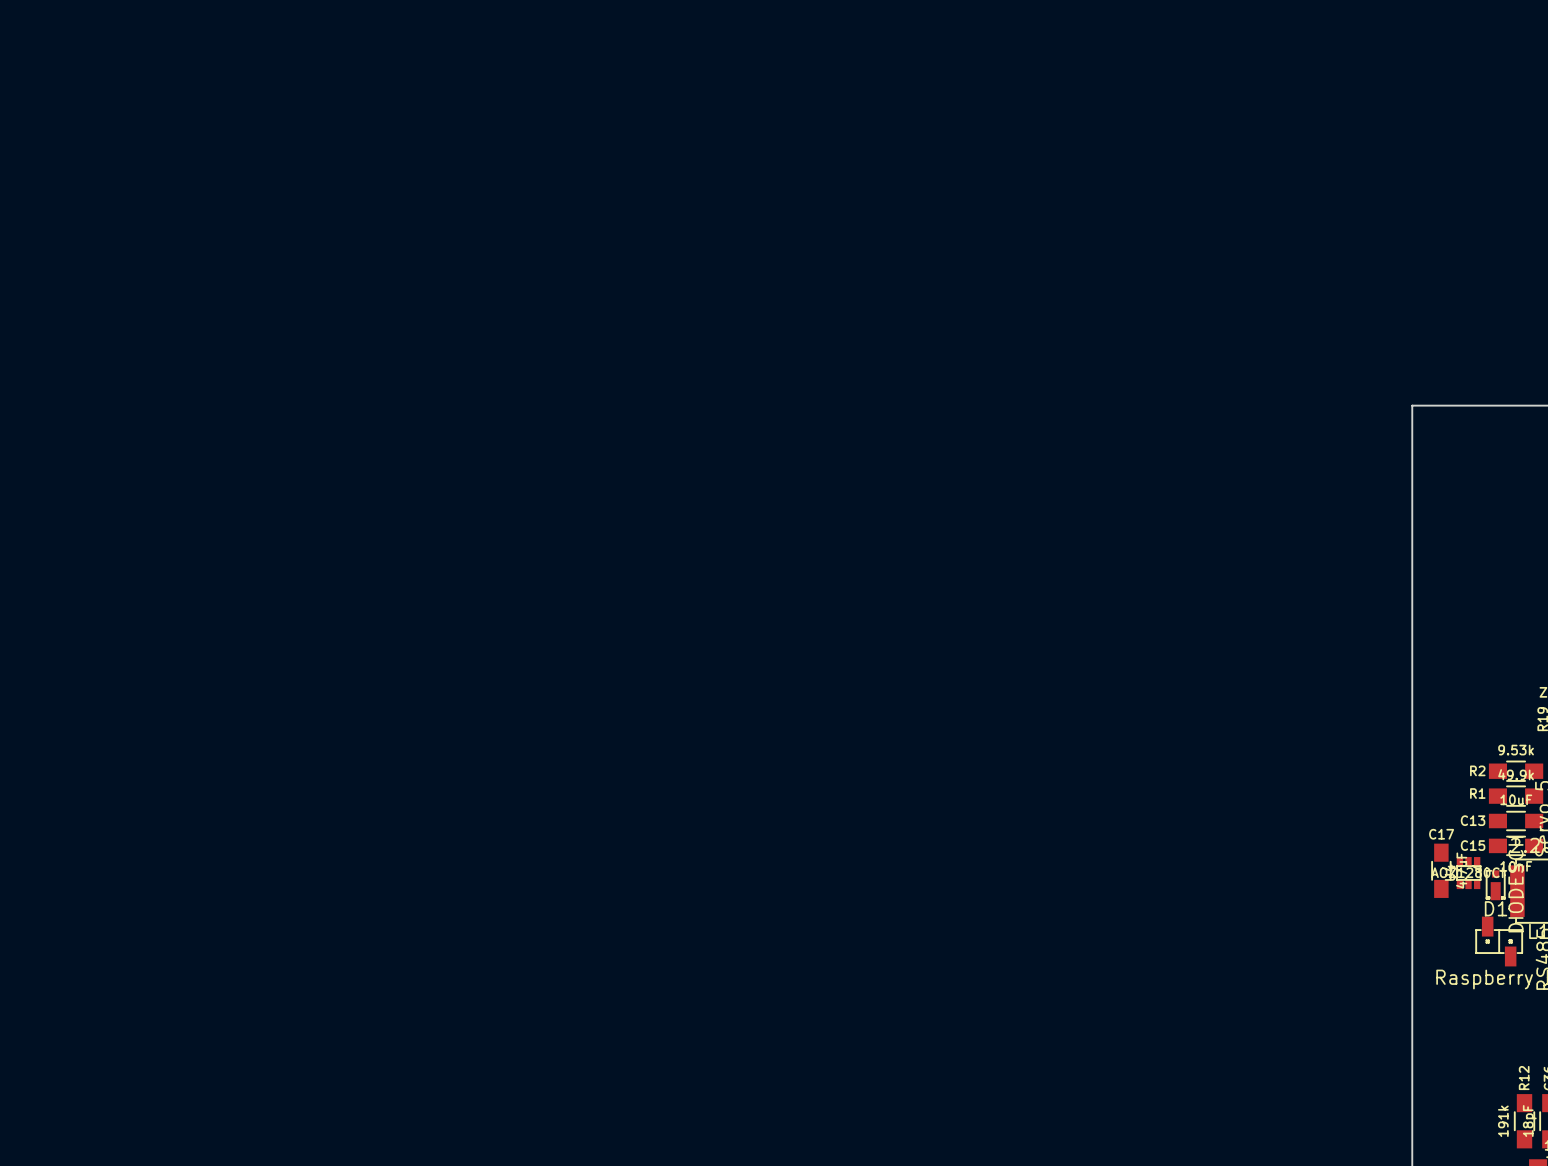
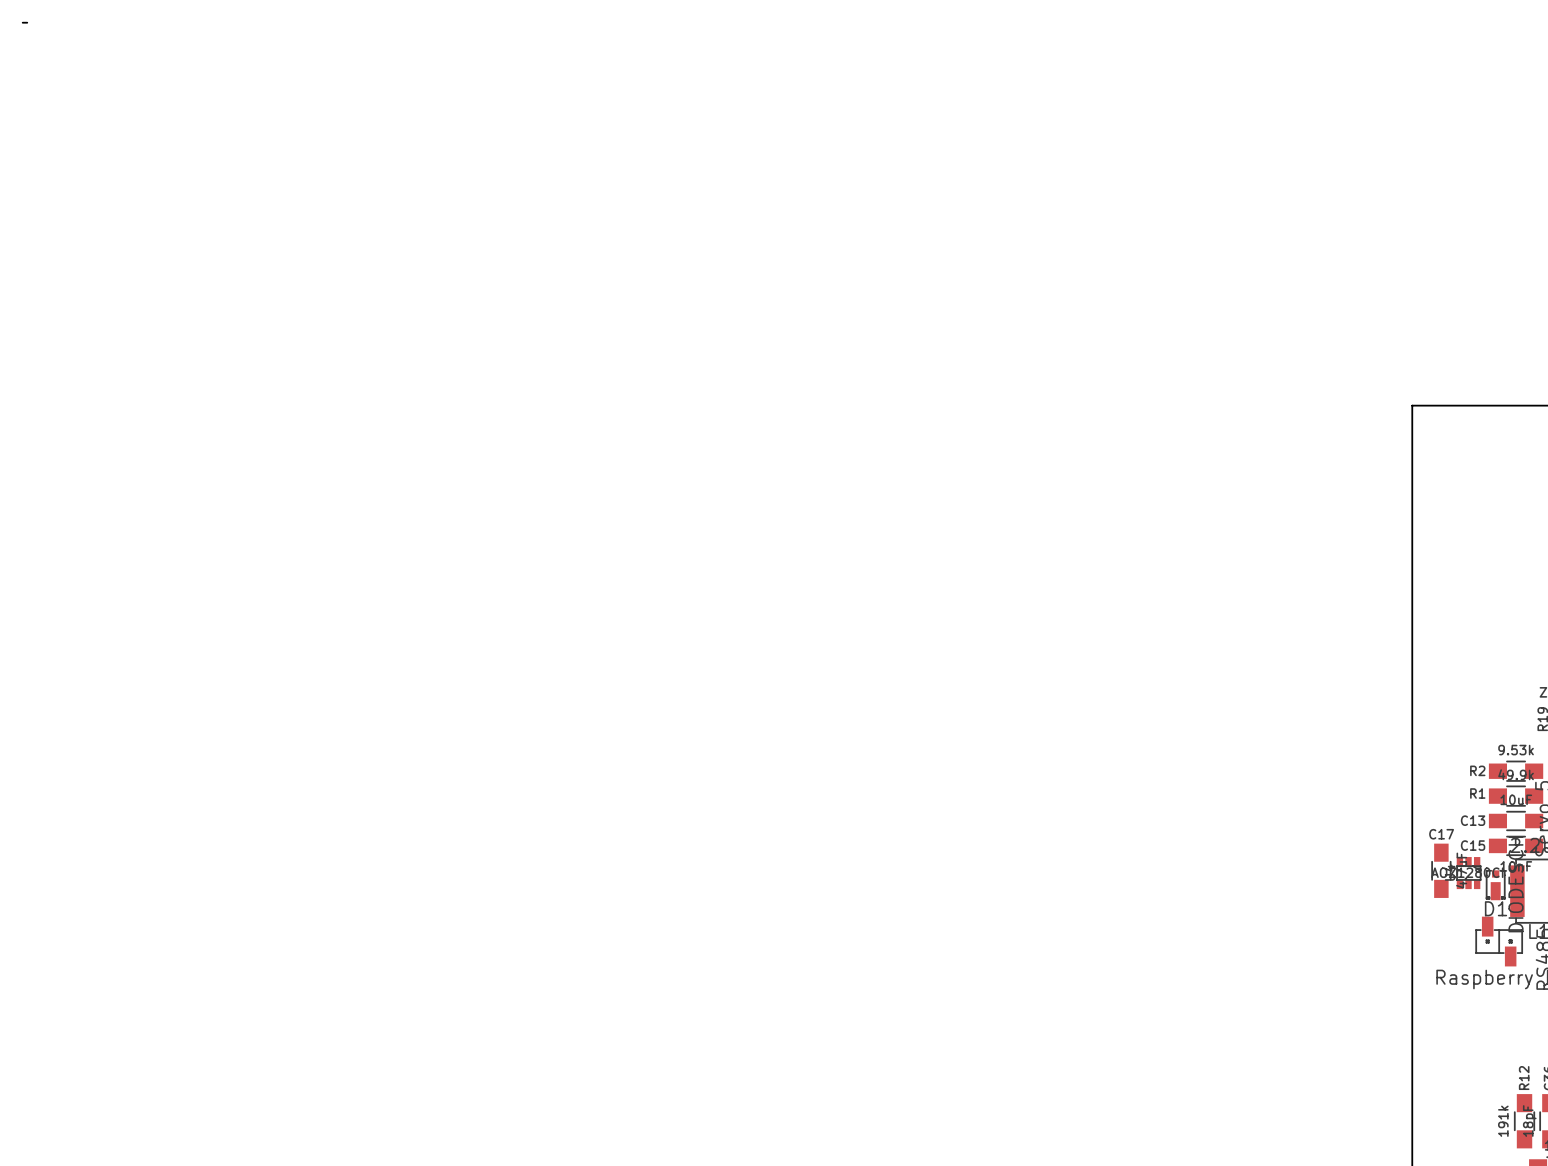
board edge: none -> (22, 22) (27, 22)

